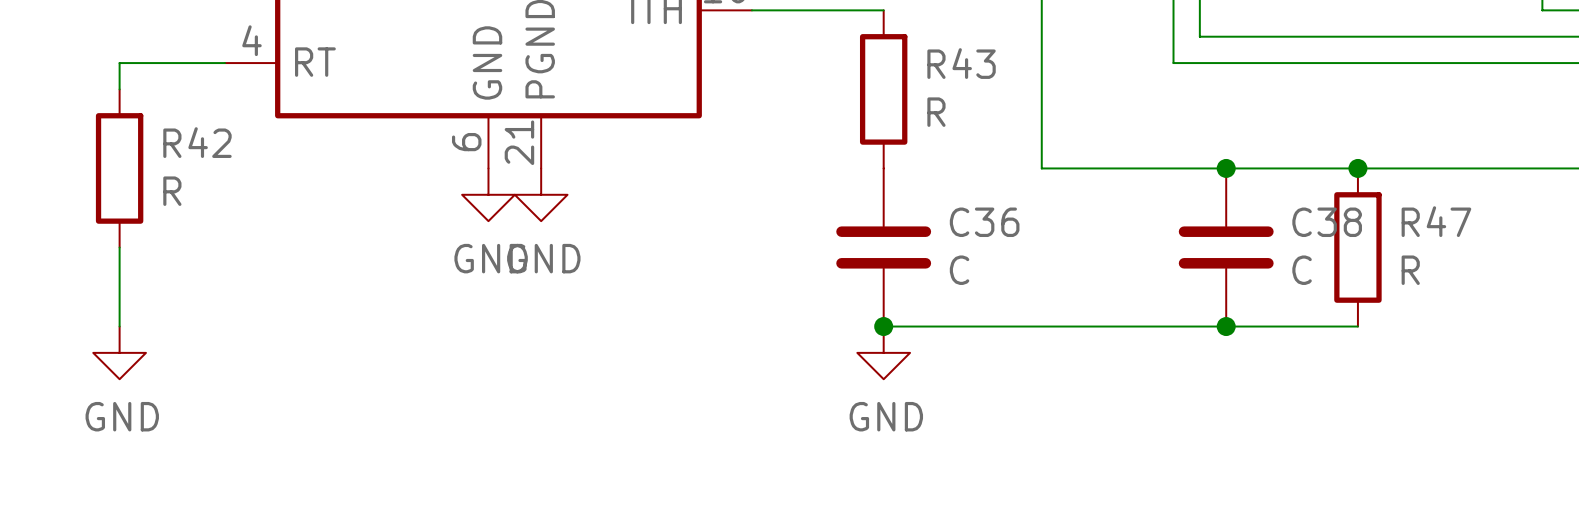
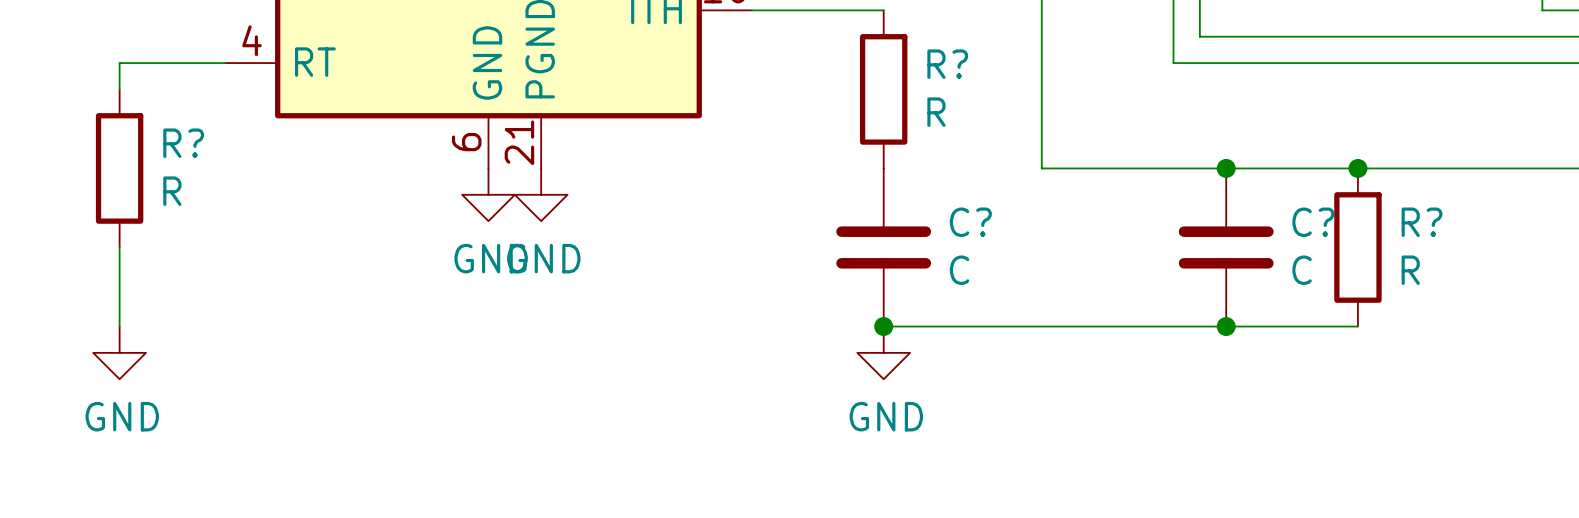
R43 name: R43 (961, 63) -> R? (947, 64)
R42 name: R42 (197, 142) -> R? (183, 143)
R47 name: R47 (1436, 221) -> R? (1422, 222)
C36 name: C36 (984, 222) -> C? (970, 222)
C38 name: C38 (1327, 222) -> C? (1313, 222)

